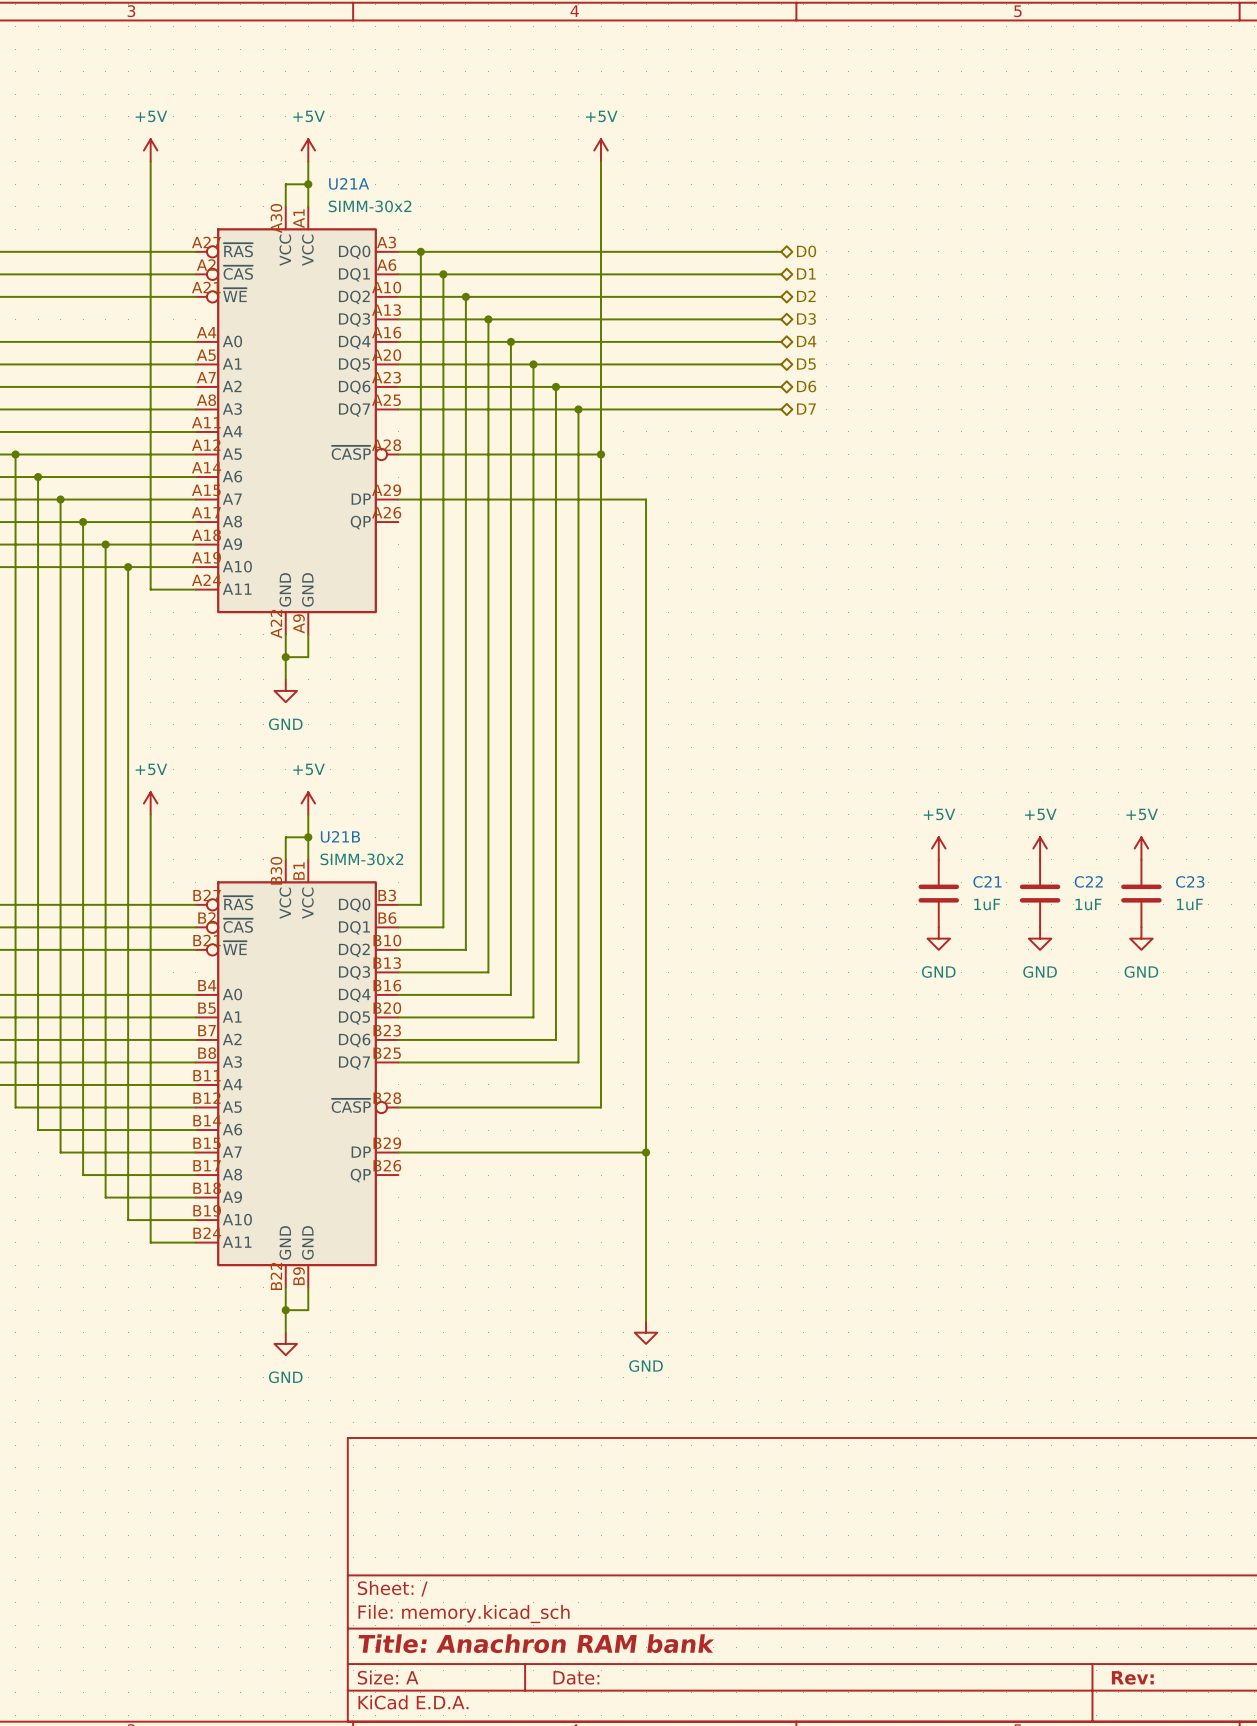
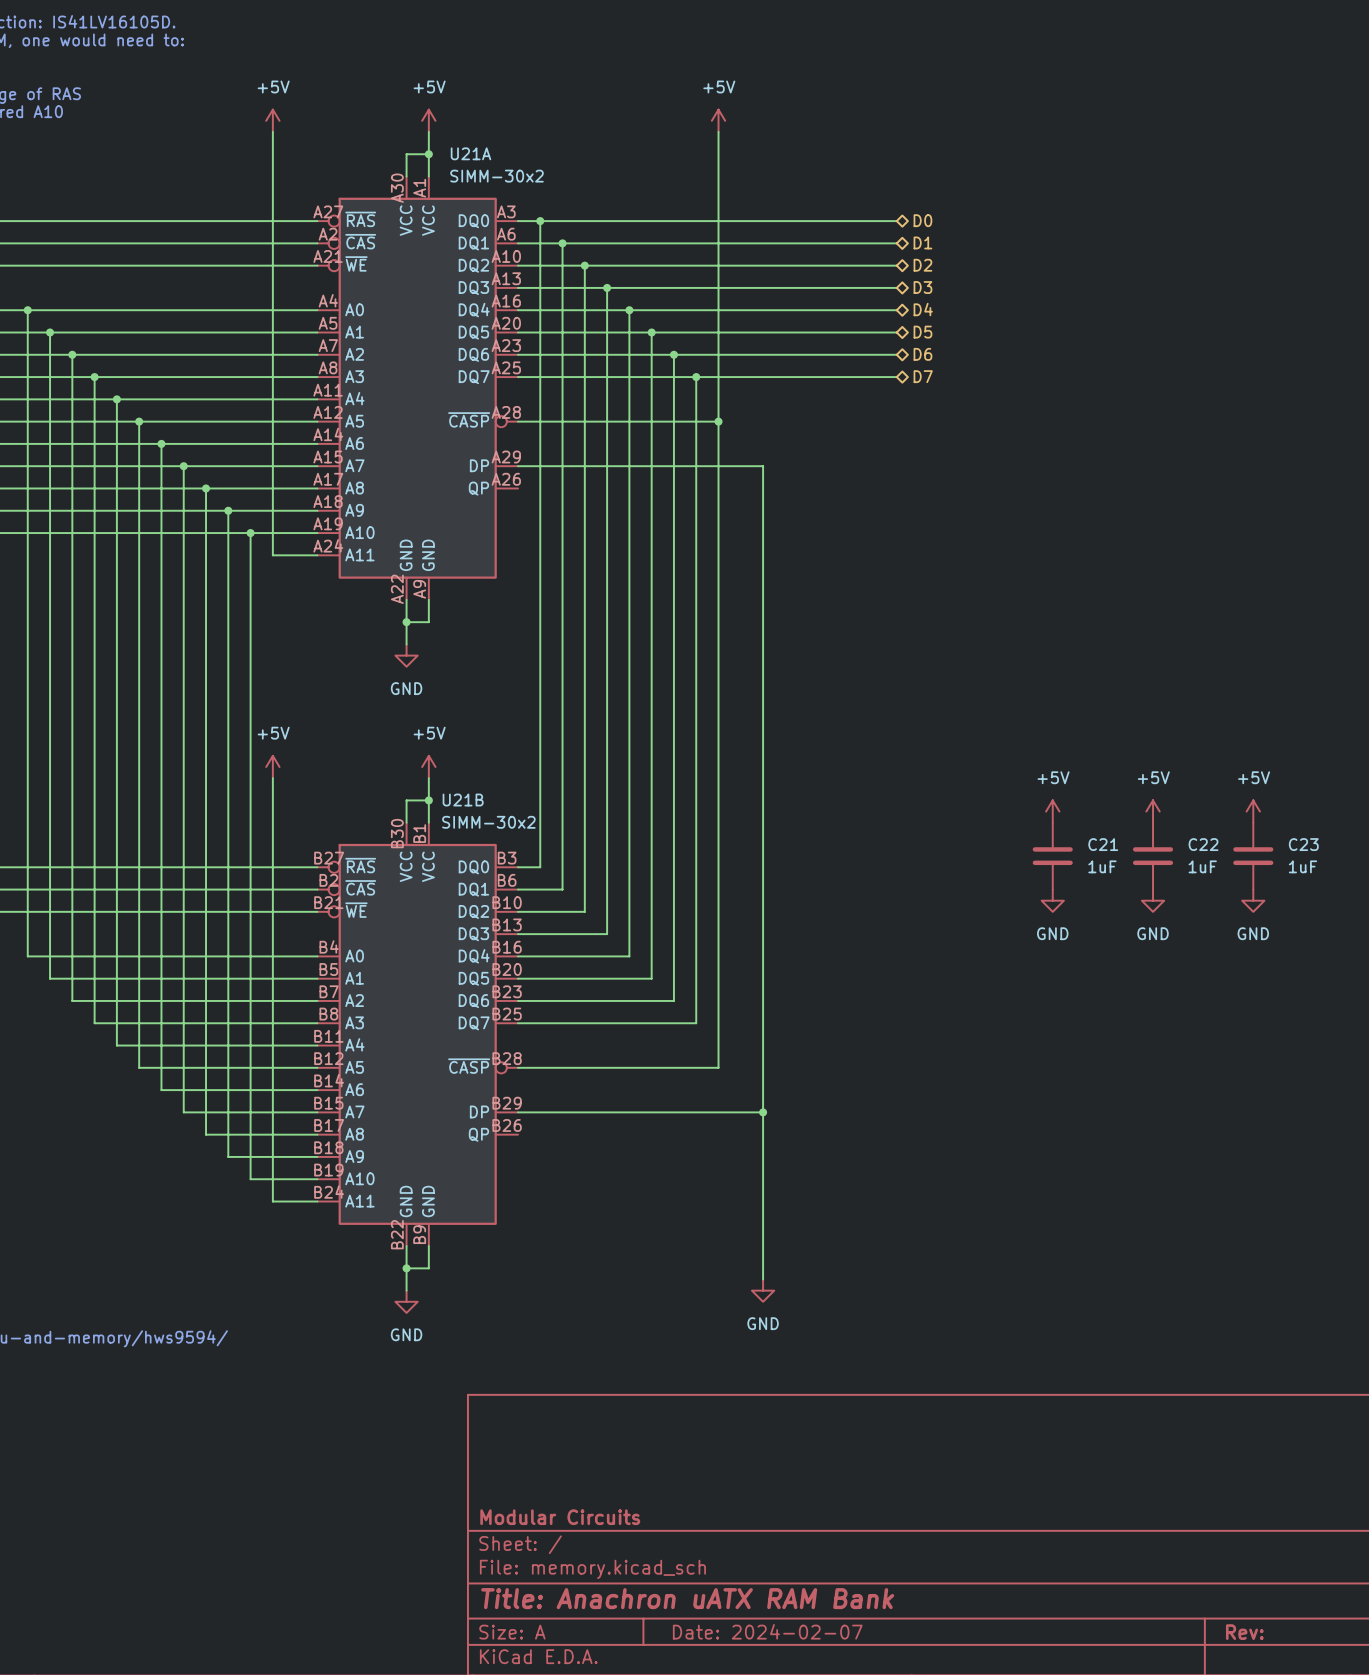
title block: none -> Modular Circuits (560, 1517)
title block: Title: Anachron RAM bank (536, 1643) -> Title: Anachron uATX RAM Bank (687, 1598)
title block: Date: (576, 1677) -> Date: 2024-02-07 (767, 1631)

